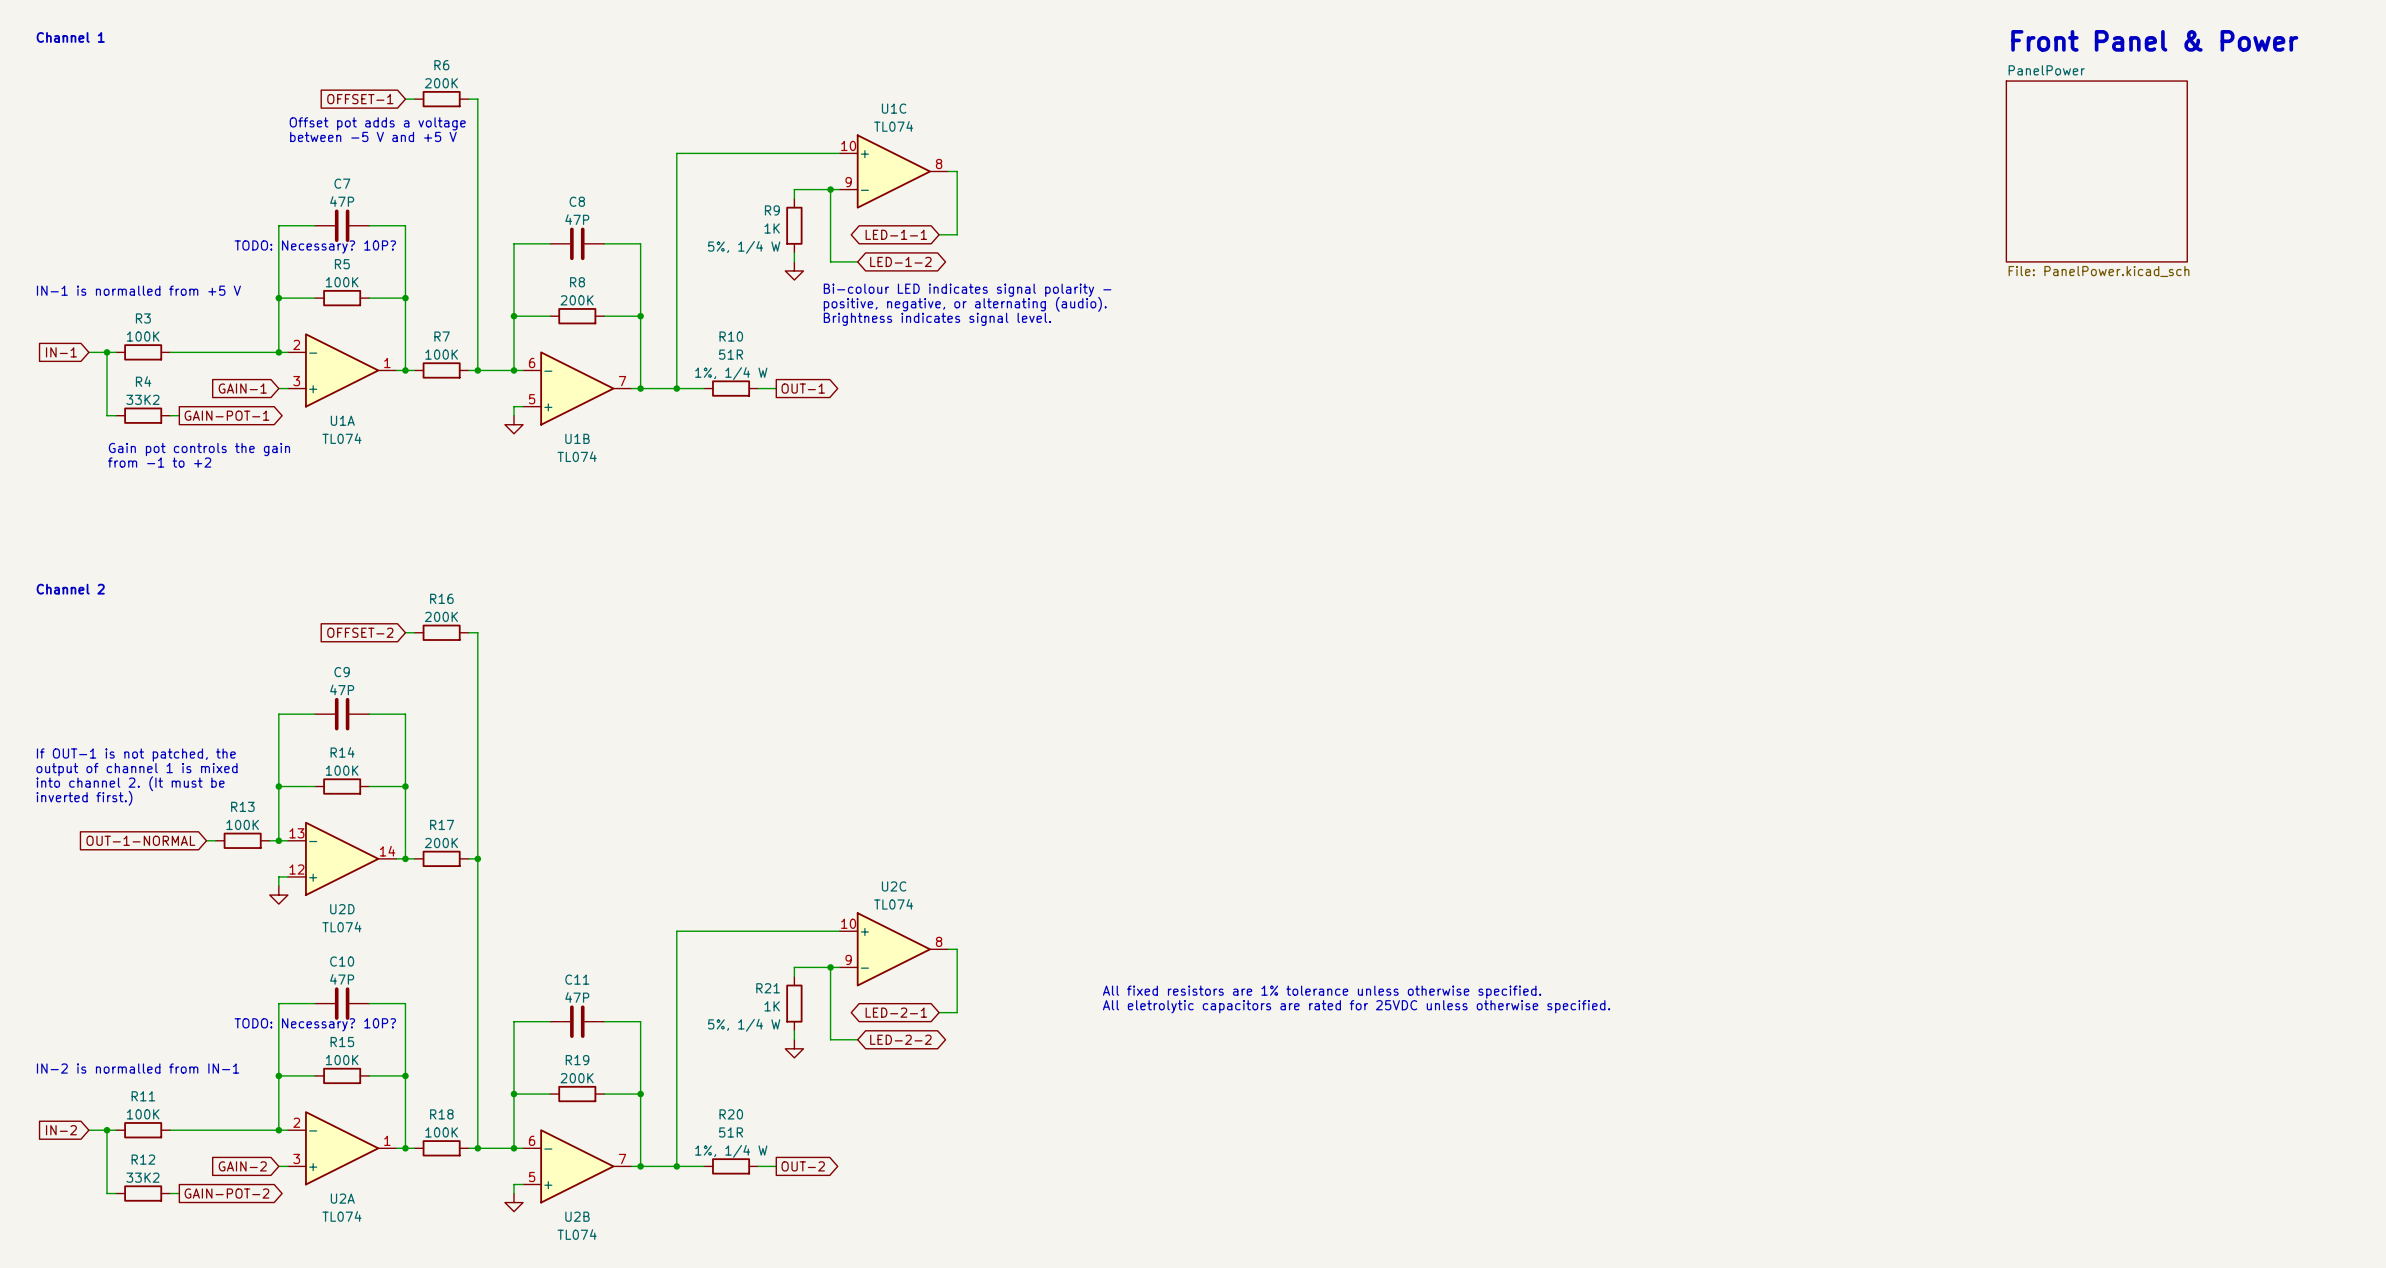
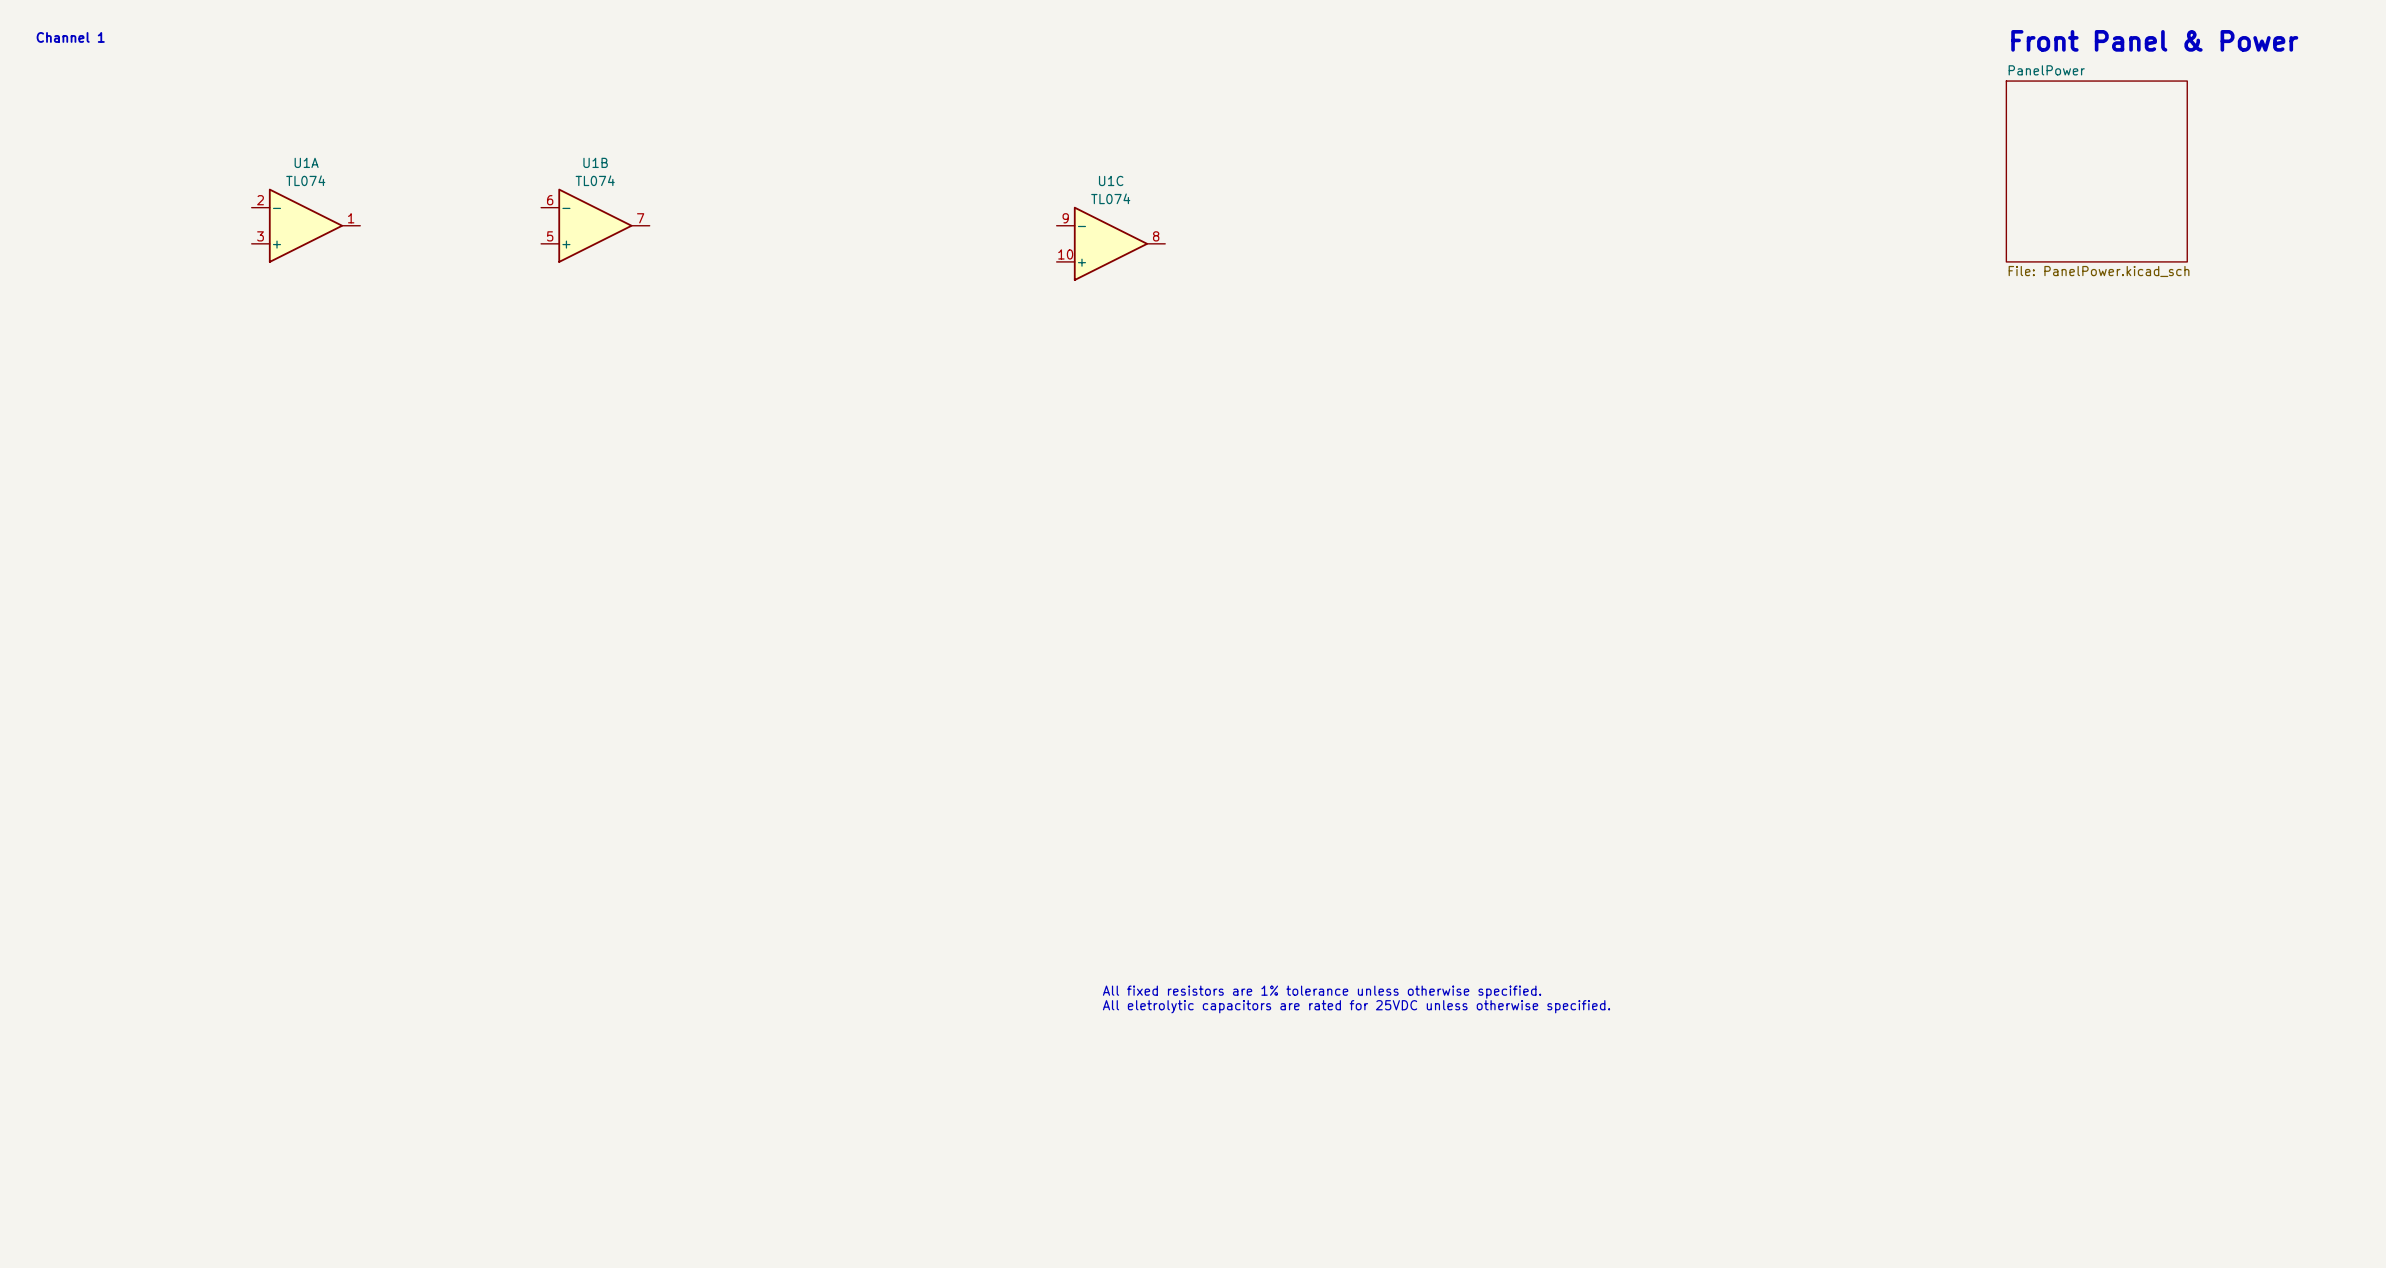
global label: OFFSET-1 (360, 99) -> none
wire: (405, 99) (414, 99) -> none
R6: 200K (441, 99) -> none
wire: (468, 99) (477, 99) (477, 370) -> none
text: Offset pot adds a voltage (377, 123) -> none
text: between -5 V and +5 V (373, 136) -> none
wire: (839, 153) (676, 153) (676, 388) -> none
U1C flip: as is (893, 171) -> up-down (1110, 243)
U1C position: (893, 171) -> (1110, 243)
wire: (948, 171) (957, 171) (957, 234) (939, 234) -> none
wire: (830, 189) (830, 261) (857, 261) -> none
junction: (830, 189) -> none
wire: (839, 189) (794, 189) (794, 198) -> none
wire: (315, 225) (278, 225) (278, 352) -> none
C7: 47P (342, 225) -> none
wire: (369, 225) (405, 225) (405, 370) -> none
R9: 1K (794, 225) -> none
global label: LED-1-1 (896, 234) -> none
wire: (550, 243) (513, 243) (513, 370) -> none
C8: 47P (577, 243) -> none
wire: (604, 243) (640, 243) (640, 388) -> none
text: TODO: Necessary? 10P? (315, 246) -> none
wire: (794, 252) (794, 261) -> none
global label: LED-1-2 (900, 261) -> none
power symbol: (794, 270) -> none
text: IN-1 is normalled from +5 V (138, 290) -> none
text: Bi-colour LED indicates signal polarity - (967, 290) -> none
wire: (278, 298) (315, 298) -> none
junction: (278, 298) -> none
R5: 100K (342, 298) -> none
wire: (369, 298) (405, 298) -> none
junction: (405, 298) -> none
text: positive, negative, or alternating (audio). (965, 304) -> none
wire: (513, 316) (550, 316) -> none
junction: (513, 316) -> none
R8: 200K (577, 316) -> none
wire: (604, 316) (640, 316) -> none
junction: (640, 316) -> none
text: Brightness indicates signal level. (937, 319) -> none
global label: IN-1 (61, 352) -> none
wire: (88, 352) (116, 352) -> none
wire: (106, 352) (106, 415) (116, 415) -> none
junction: (106, 352) -> none
R3: 100K (143, 352) -> none
wire: (170, 352) (287, 352) -> none
junction: (278, 352) -> none
U1A position: (342, 370) -> (305, 225)
wire: (396, 370) (414, 370) -> none
junction: (405, 370) -> none
R7: 100K (441, 370) -> none
wire: (468, 370) (523, 370) -> none
junction: (477, 370) -> none
junction: (513, 370) -> none
global label: GAIN-1 (242, 388) -> none
wire: (278, 388) (287, 388) -> none
U1B position: (577, 388) -> (595, 225)
wire: (631, 388) (703, 388) -> none
junction: (640, 388) -> none
junction: (676, 388) -> none
R10: 51R (731, 388) -> none
wire: (758, 388) (776, 388) -> none
global label: OUT-1 (803, 388) -> none
wire: (523, 406) (513, 406) (513, 415) -> none
R4: 33K2 (143, 415) -> none
wire: (170, 415) (179, 415) -> none
global label: GAIN-POT-1 (226, 415) -> none
U1A name position: U1A (342, 420) -> U1A (306, 162)
power symbol: (513, 424) -> none
U1A value position: TL074 (341, 438) -> TL074 (305, 180)
U1B name position: U1B (577, 438) -> U1B (595, 162)
text: Gain pot controls the gain (199, 449) -> none
U1B value position: TL074 (577, 456) -> TL074 (595, 180)
text: from -1 to +2 (159, 462) -> none
text: Channel 2 (70, 589) -> none
global label: OFFSET-2 (360, 632) -> none
wire: (405, 632) (414, 632) -> none
R16: 200K (441, 632) -> none
wire: (468, 632) (477, 632) (477, 1148) -> none
wire: (315, 714) (278, 714) (278, 840) -> none
C9: 47P (342, 714) -> none
wire: (369, 714) (405, 714) (405, 858) -> none
text: If OUT-1 is not patched, the (136, 755) -> none
text: output of channel 1 is mixed (136, 769) -> none
text: into channel 2. (It must be (130, 783) -> none
wire: (278, 786) (315, 786) -> none
junction: (278, 786) -> none
R14: 100K (342, 786) -> none
wire: (369, 786) (405, 786) -> none
junction: (405, 786) -> none
text: inverted first.) (84, 798) -> none
global label: OUT-1-NORMAL (140, 840) -> none
wire: (206, 840) (215, 840) -> none
R13: 100K (242, 840) -> none
wire: (269, 840) (287, 840) -> none
junction: (278, 840) -> none
U2D: TL074 (342, 858) -> none
wire: (396, 858) (414, 858) -> none
junction: (405, 858) -> none
R17: 200K (441, 858) -> none
wire: (468, 858) (477, 858) -> none
junction: (477, 858) -> none
wire: (287, 876) (278, 876) (278, 886) -> none
power symbol: (278, 895) -> none
wire: (839, 931) (676, 931) (676, 1166) -> none
U2C: TL074 (893, 949) -> none
wire: (948, 949) (957, 949) (957, 1012) (939, 1012) -> none
wire: (830, 967) (830, 1039) (857, 1039) -> none
junction: (830, 967) -> none
wire: (839, 967) (794, 967) (794, 976) -> none
wire: (315, 1003) (278, 1003) (278, 1130) -> none
C10: 47P (342, 1003) -> none
wire: (369, 1003) (405, 1003) (405, 1148) -> none
R21: 1K (794, 1003) -> none
global label: LED-2-1 (896, 1012) -> none
wire: (550, 1021) (513, 1021) (513, 1148) -> none
C11: 47P (577, 1021) -> none
wire: (604, 1021) (640, 1021) (640, 1166) -> none
text: TODO: Necessary? 10P? (315, 1024) -> none
wire: (794, 1030) (794, 1039) -> none
global label: LED-2-2 (900, 1039) -> none
power symbol: (794, 1048) -> none
text: IN-2 is normalled from IN-1 (138, 1068) -> none
wire: (278, 1075) (315, 1075) -> none
junction: (278, 1075) -> none
R15: 100K (342, 1075) -> none
wire: (369, 1075) (405, 1075) -> none
junction: (405, 1075) -> none
wire: (513, 1094) (550, 1094) -> none
junction: (513, 1094) -> none
R19: 200K (577, 1094) -> none
wire: (604, 1094) (640, 1094) -> none
junction: (640, 1094) -> none
global label: IN-2 (61, 1130) -> none
wire: (88, 1130) (116, 1130) -> none
wire: (106, 1130) (106, 1193) (116, 1193) -> none
junction: (106, 1130) -> none
R11: 100K (143, 1130) -> none
wire: (170, 1130) (287, 1130) -> none
junction: (278, 1130) -> none
U2A: TL074 (342, 1148) -> none
wire: (396, 1148) (414, 1148) -> none
junction: (405, 1148) -> none
R18: 100K (441, 1148) -> none
wire: (468, 1148) (523, 1148) -> none
junction: (477, 1148) -> none
junction: (513, 1148) -> none
global label: GAIN-2 (242, 1166) -> none
wire: (278, 1166) (287, 1166) -> none
U2B: TL074 (577, 1166) -> none
wire: (631, 1166) (703, 1166) -> none
junction: (640, 1166) -> none
junction: (676, 1166) -> none
R20: 51R (731, 1166) -> none
wire: (758, 1166) (776, 1166) -> none
global label: OUT-2 (803, 1166) -> none
wire: (523, 1184) (513, 1184) (513, 1193) -> none
R12: 33K2 (143, 1193) -> none
wire: (170, 1193) (179, 1193) -> none
global label: GAIN-POT-2 (226, 1193) -> none
power symbol: (513, 1202) -> none

